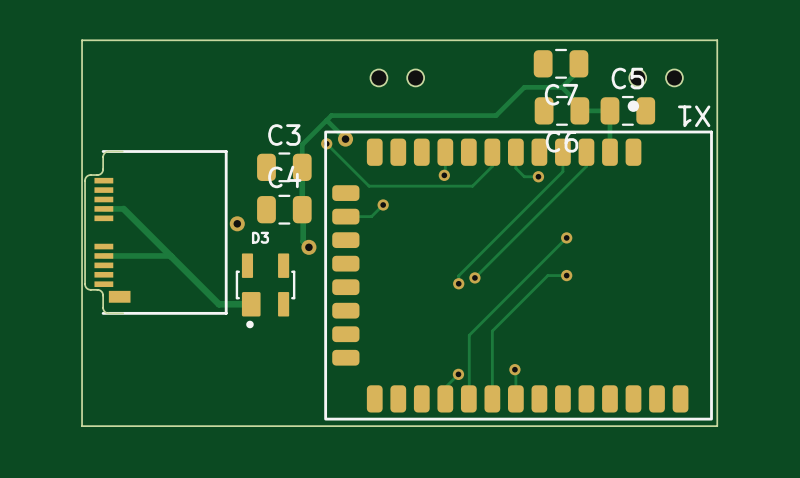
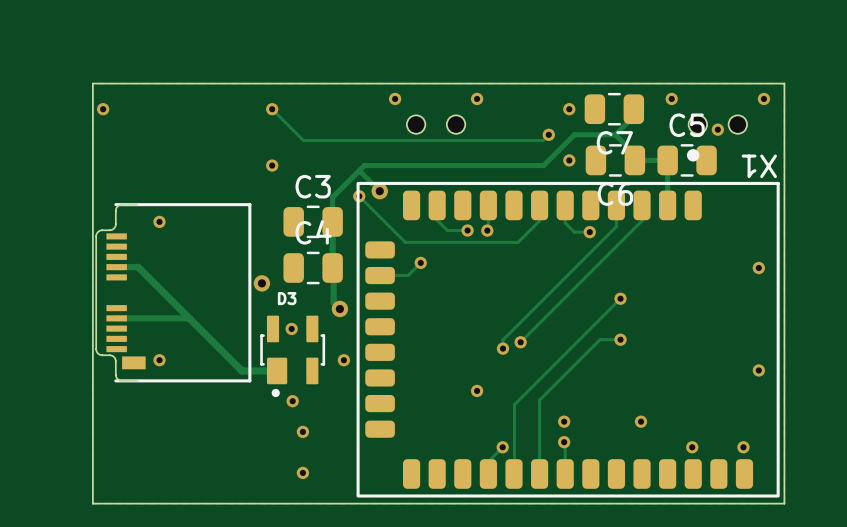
via: none -> (395, 98)
via: none -> (477, 98)
via: none -> (671, 98)
via: none -> (763, 98)
via: none -> (103, 109)
track: none -> (272, 109) (303, 140) (543, 140) (548, 134)
via: none -> (272, 109)
via: none -> (569, 109)
via: none -> (717, 129)
via: none -> (548, 134)
via: none -> (569, 160)
via: none -> (272, 165)
track: none -> (437, 205) (437, 220) (447, 230) (467, 230)
via: none -> (159, 221)
via: none -> (467, 230)
via: none -> (758, 268)
via: none -> (291, 328)
via: none -> (159, 360)
via: none -> (343, 360)
via: none -> (758, 370)
via: none -> (477, 390)
via: none -> (292, 401)
via: none -> (564, 421)
via: none -> (641, 421)
via: none -> (302, 431)
via: none -> (692, 447)
via: none -> (743, 447)
via: none -> (302, 472)

